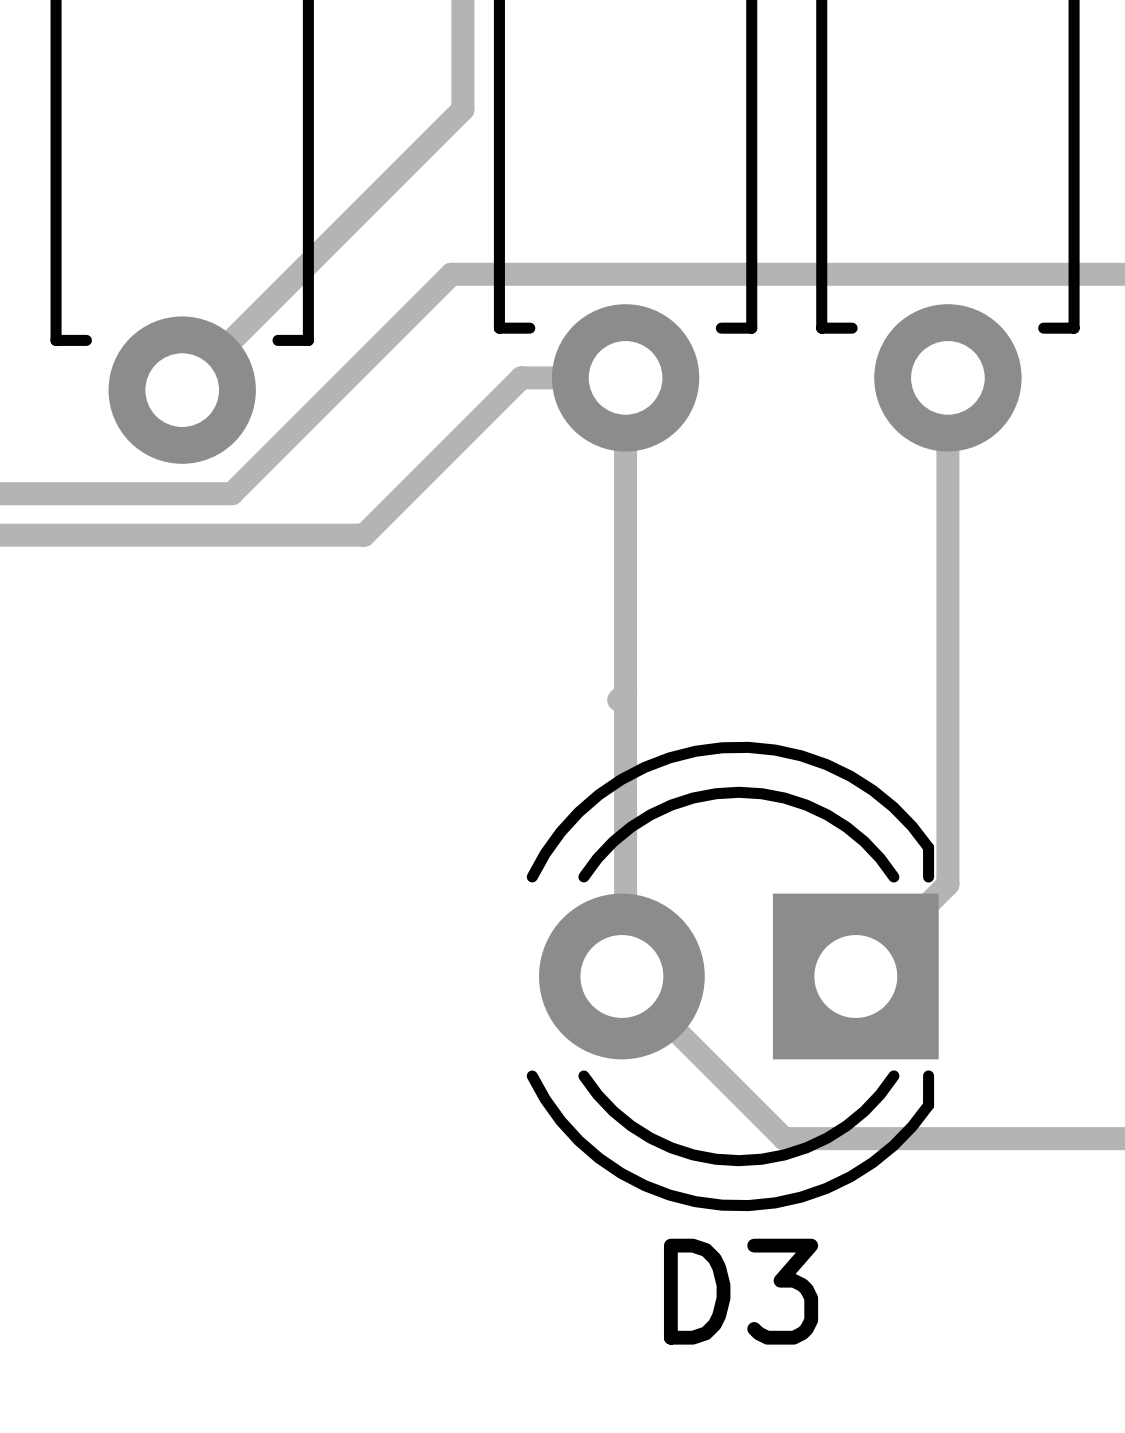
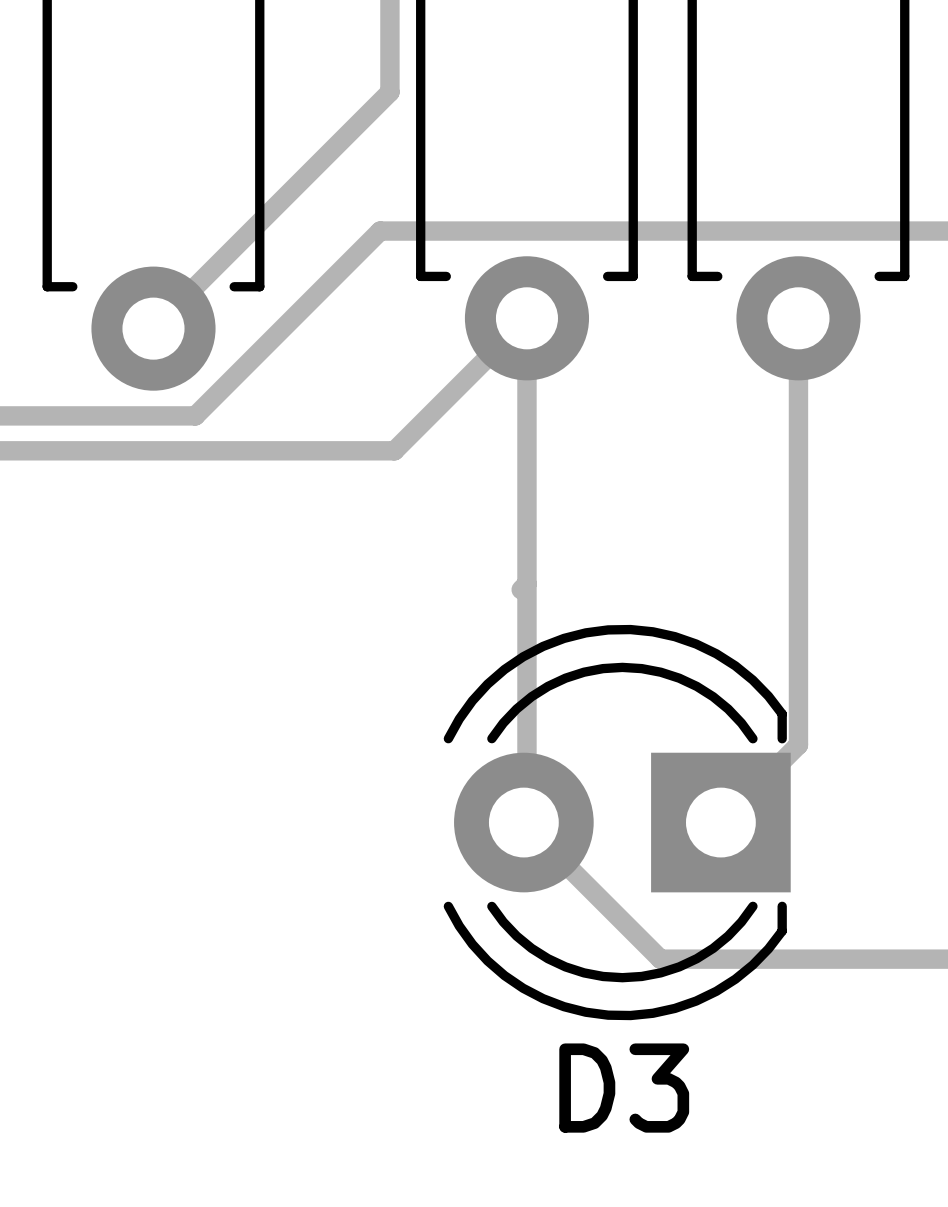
track: (625, 377) (521, 377) (364, 535) -> (526, 318) (394, 450) (306, 450)

